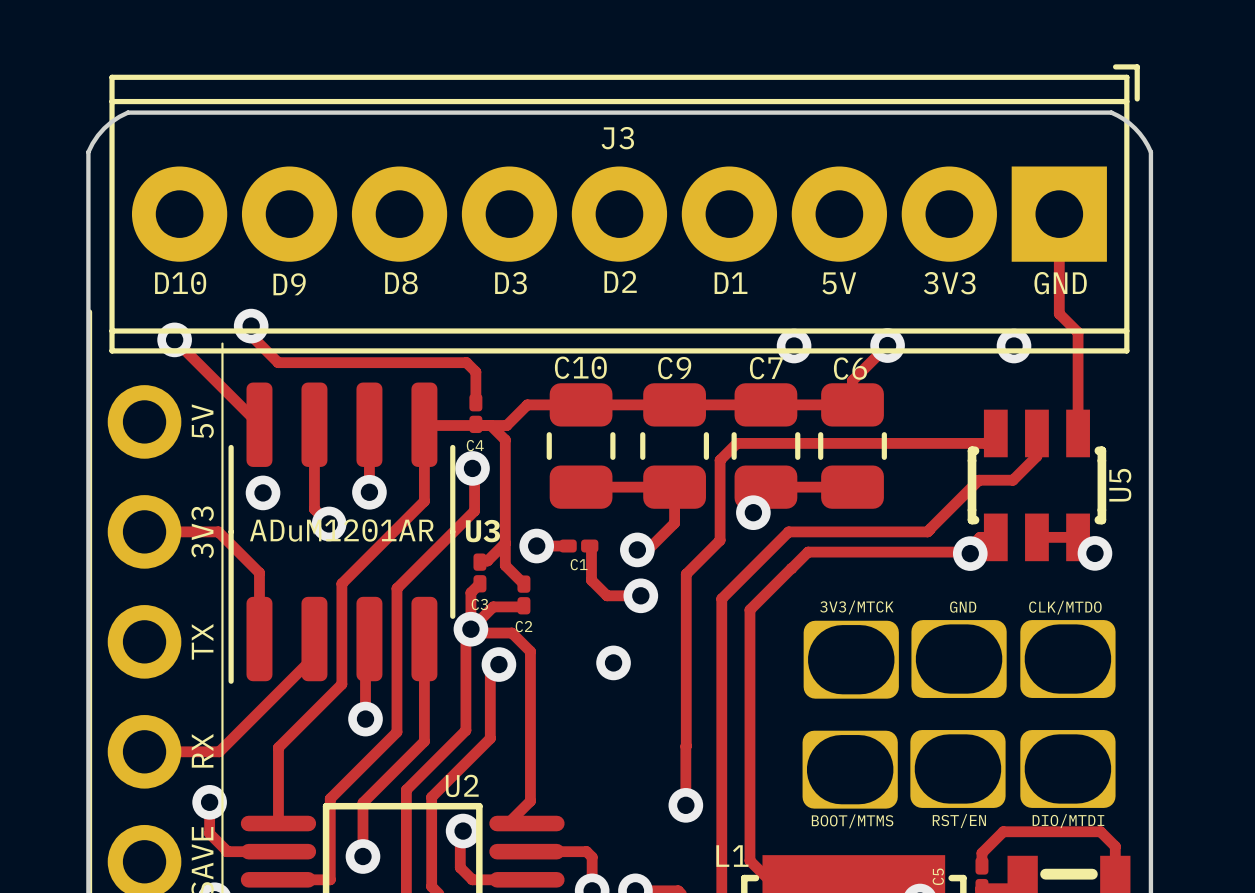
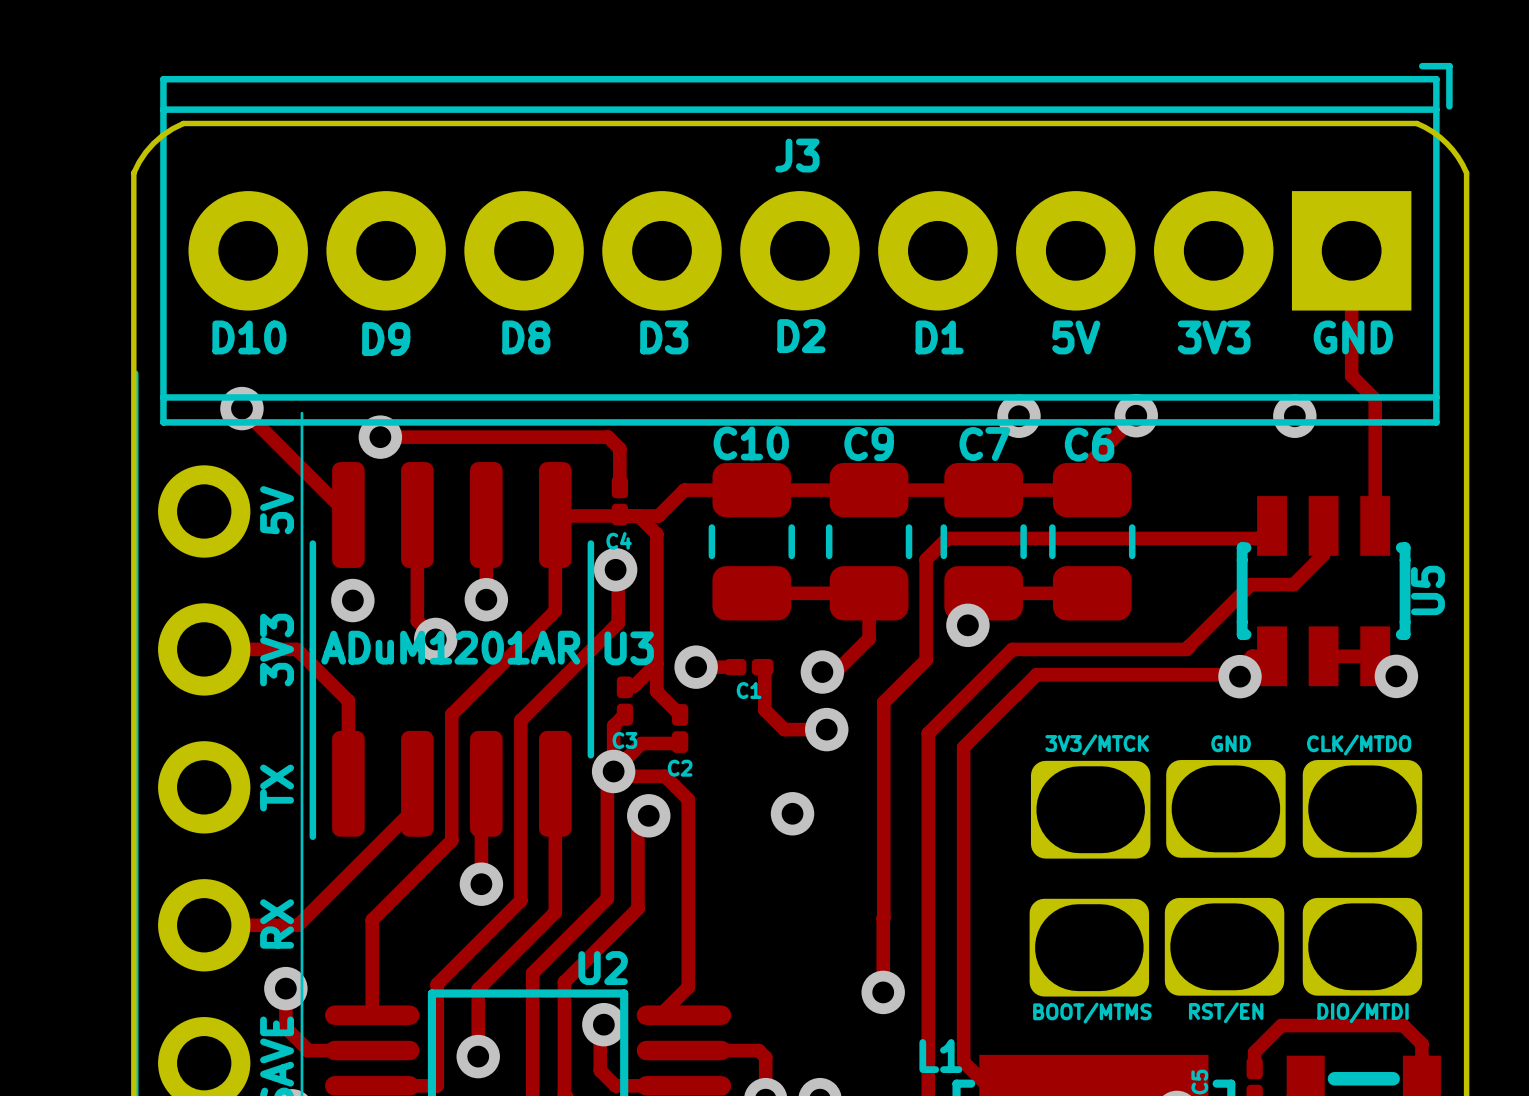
track: (251, 326) (251, 335) (278, 362) (284, 362) -> none
via position: (251, 326) -> (380, 437)

